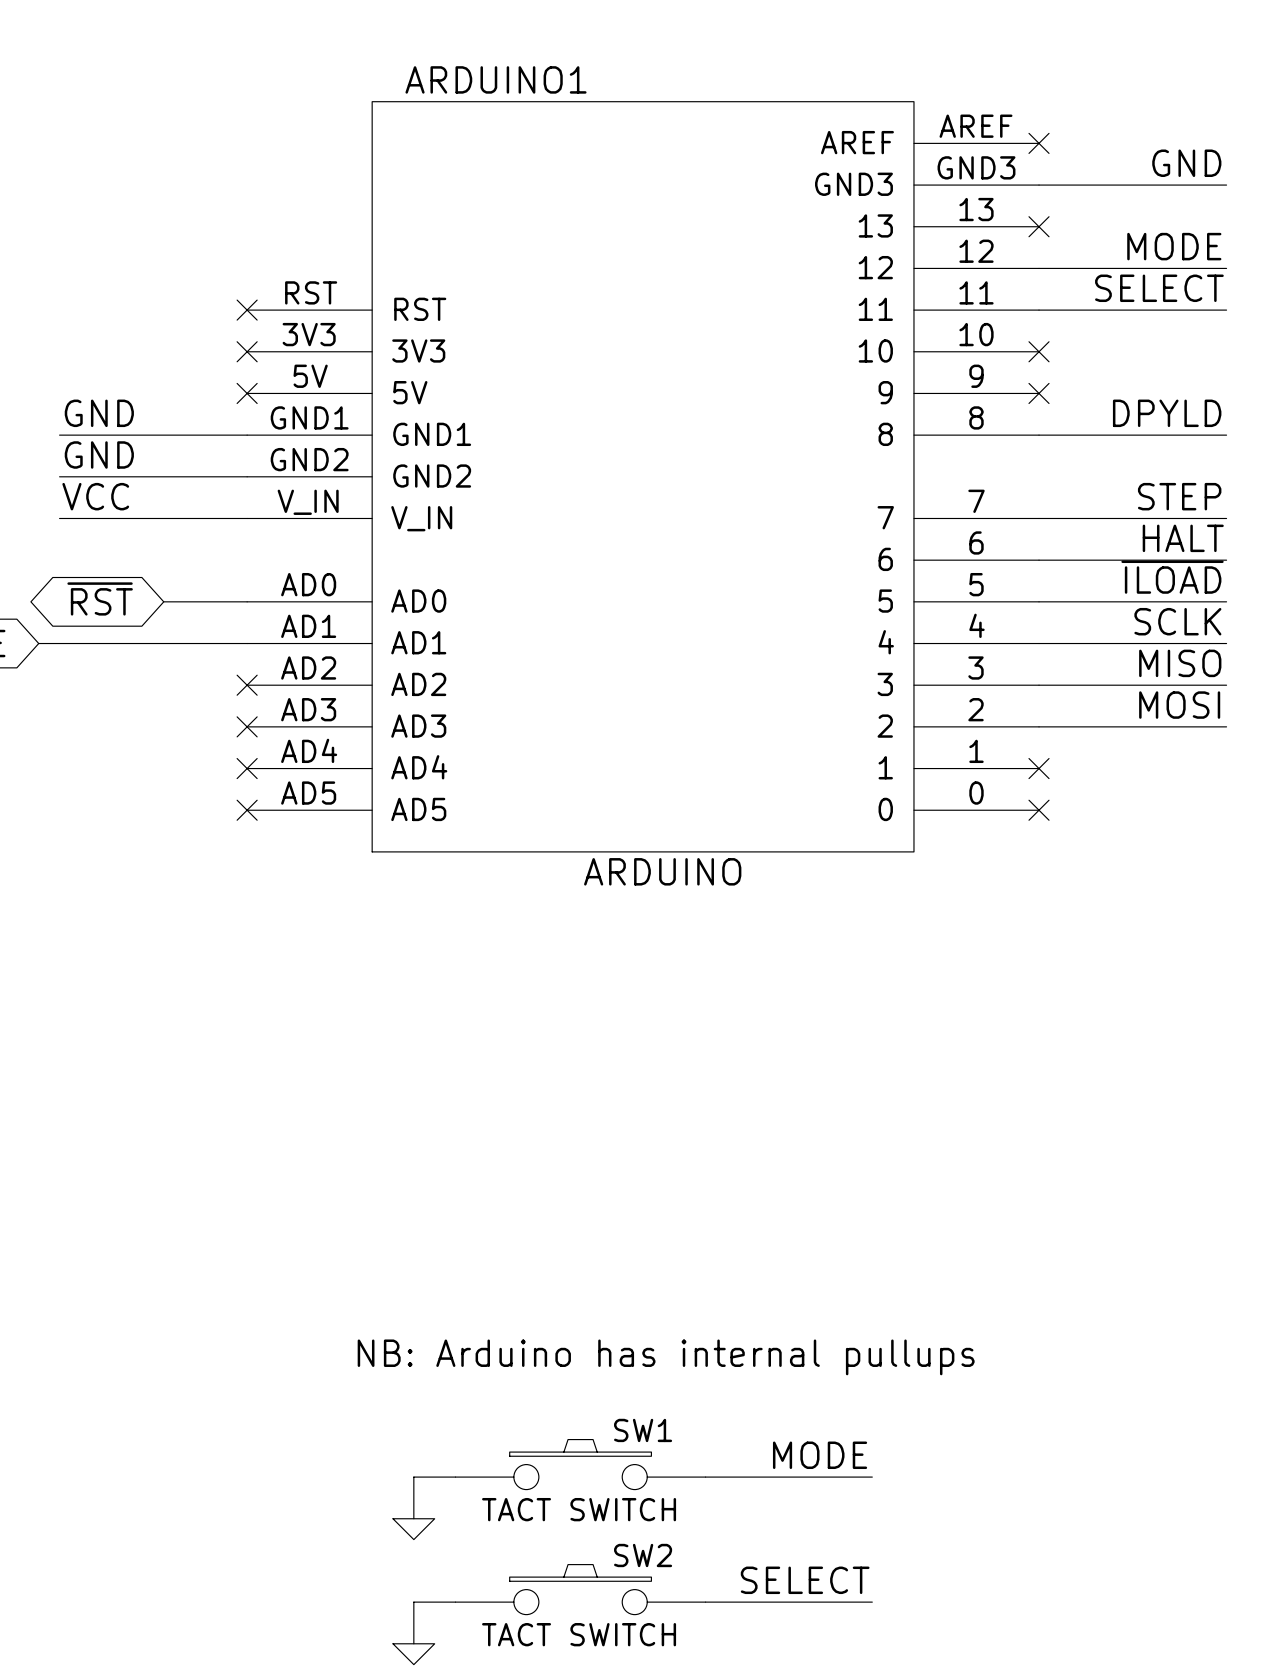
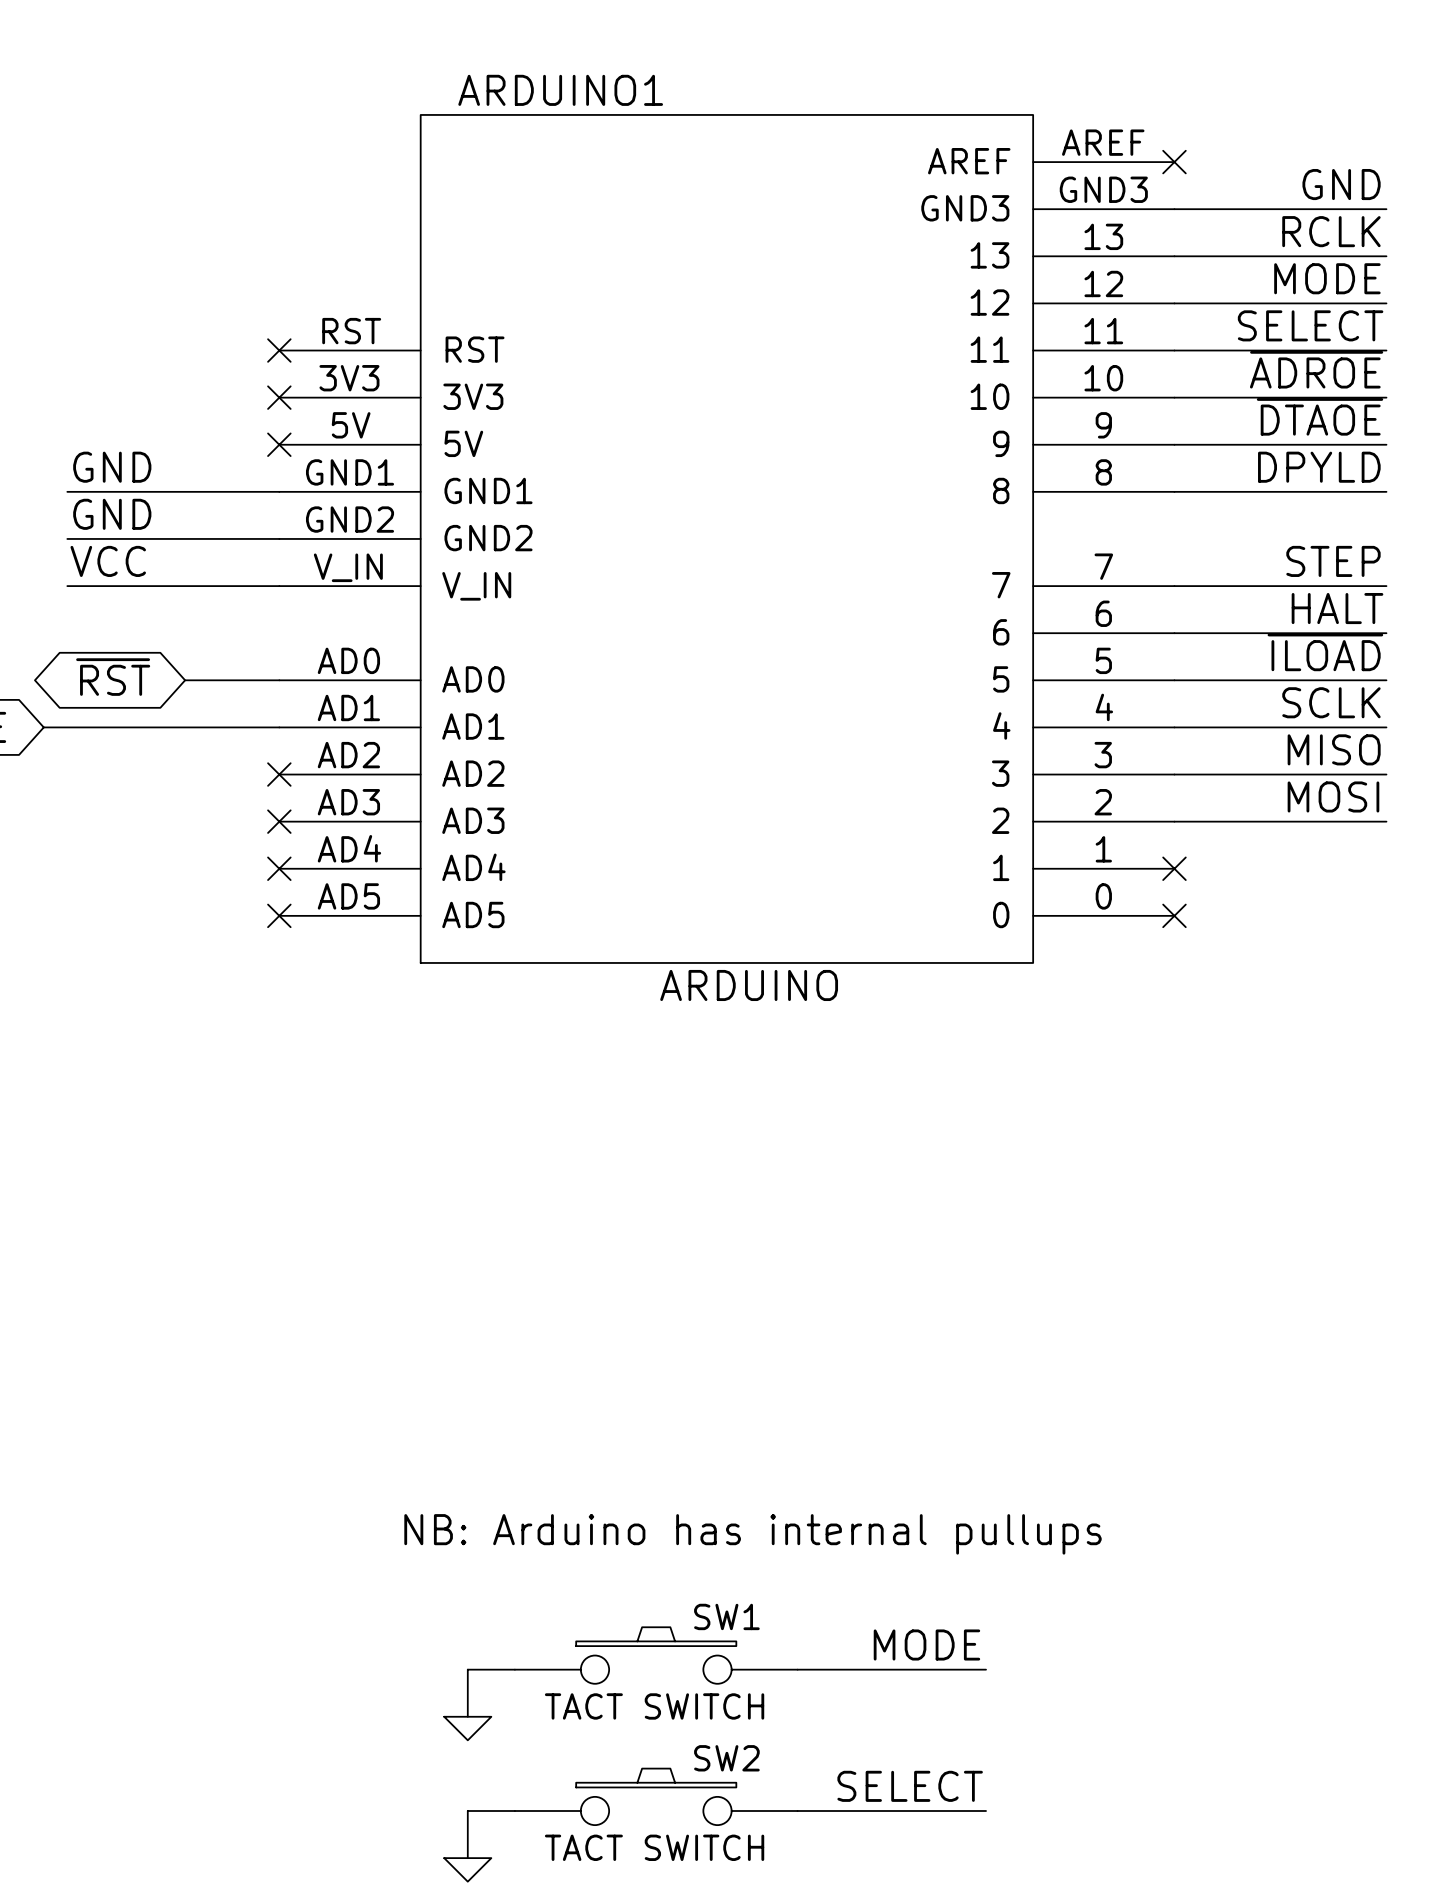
label: none -> RCLK (1331, 231)
wire: none -> (1174, 256) (1386, 256)
no-connect mark: (1039, 226) -> none
label: none -> ~{ADROE} (1316, 369)
wire: none -> (1174, 397) (1386, 397)
no-connect mark: (1039, 351) -> none
label: none -> ~{DTAOE} (1320, 416)
wire: none -> (1174, 444) (1386, 444)
no-connect mark: (1039, 393) -> none

